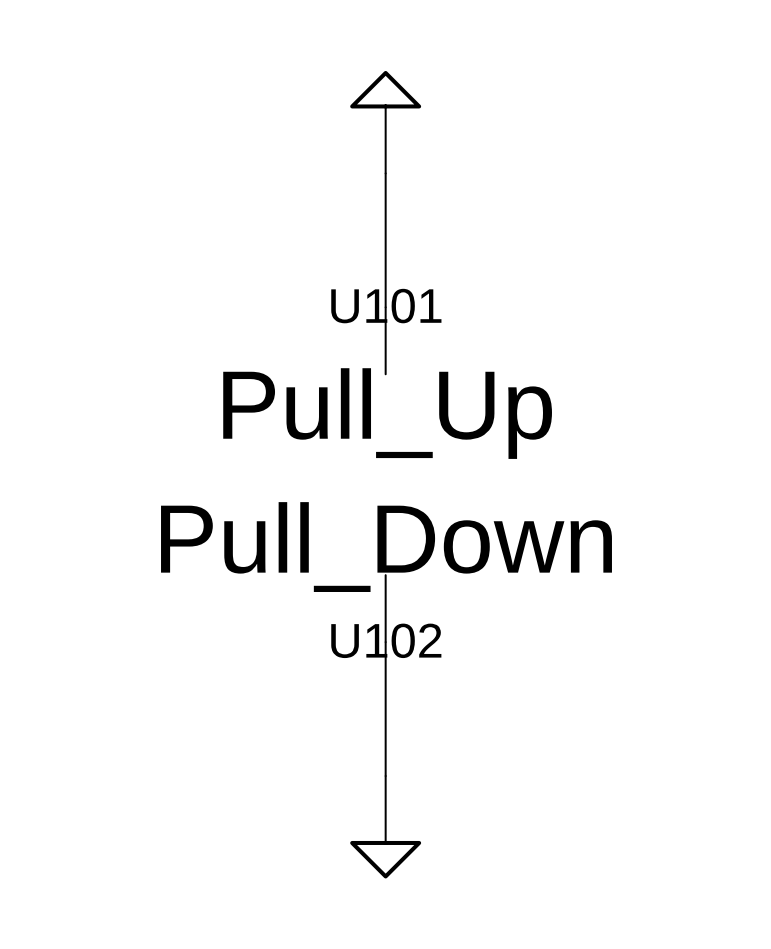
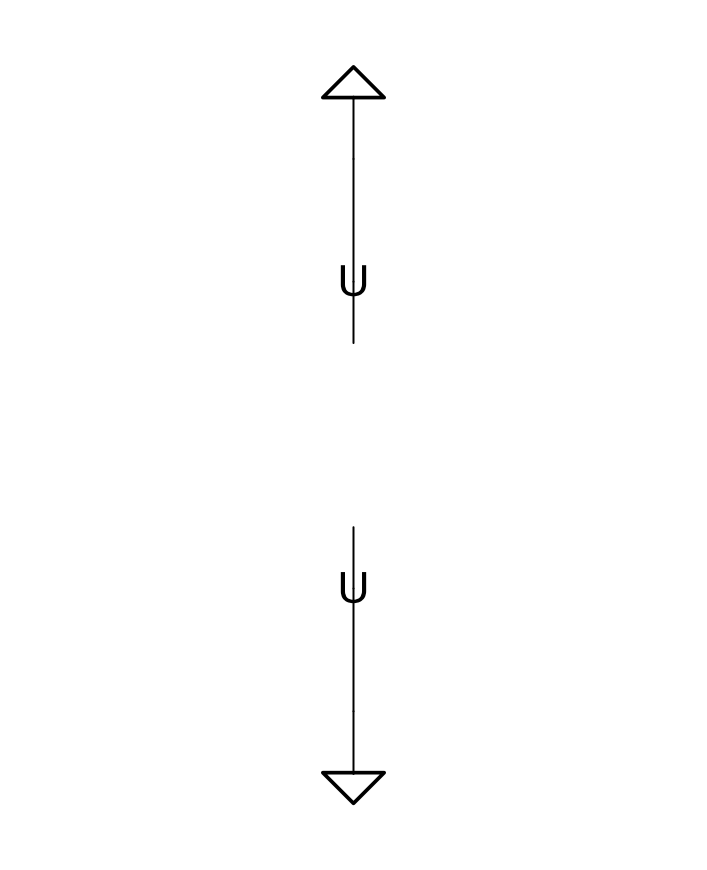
U101 name: U101 (386, 306) -> U (353, 280)
U101 value: Pull_Up (387, 413) -> none
U102 value: Pull_Down (386, 547) -> none
U102 name: U102 (386, 640) -> U (353, 587)

